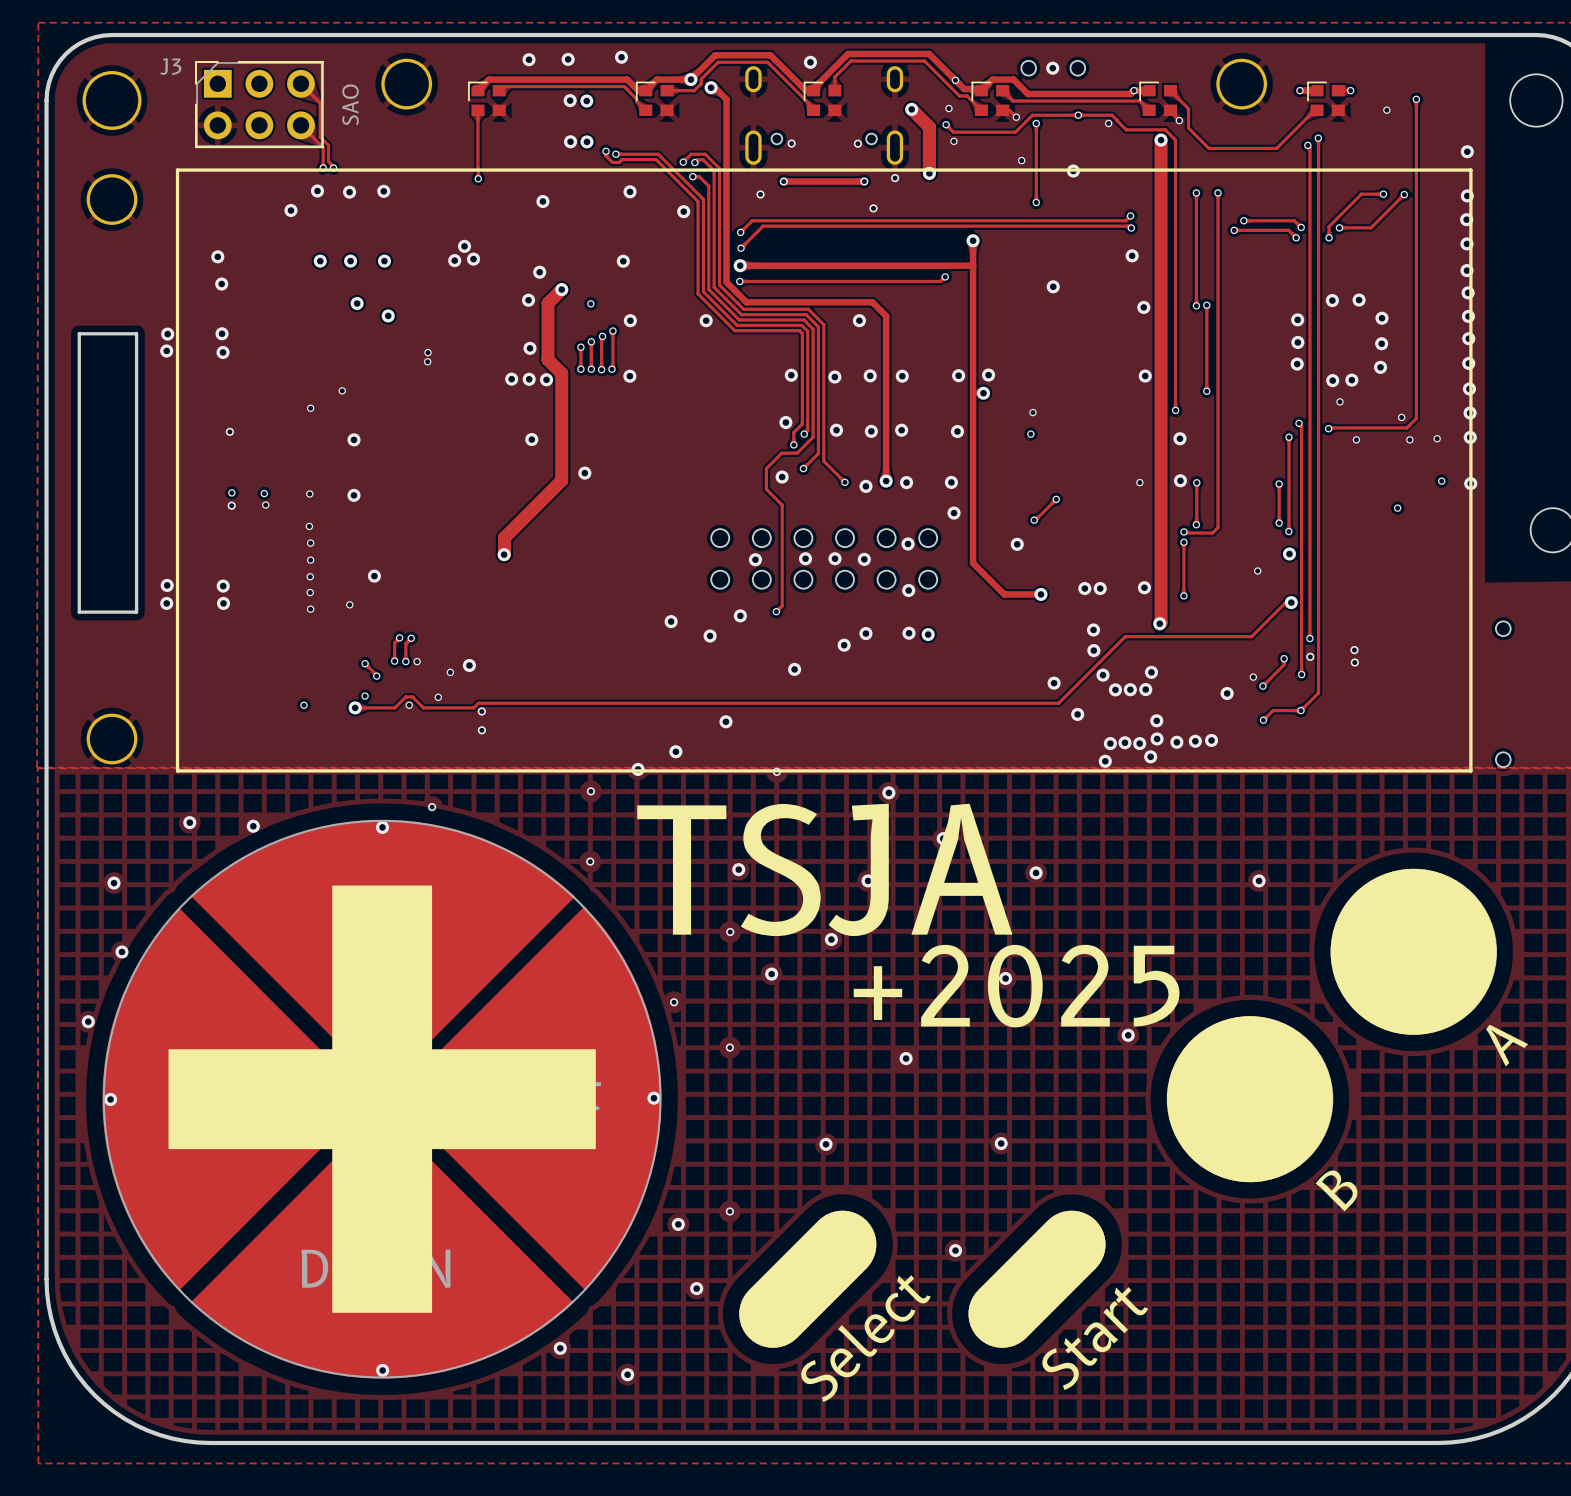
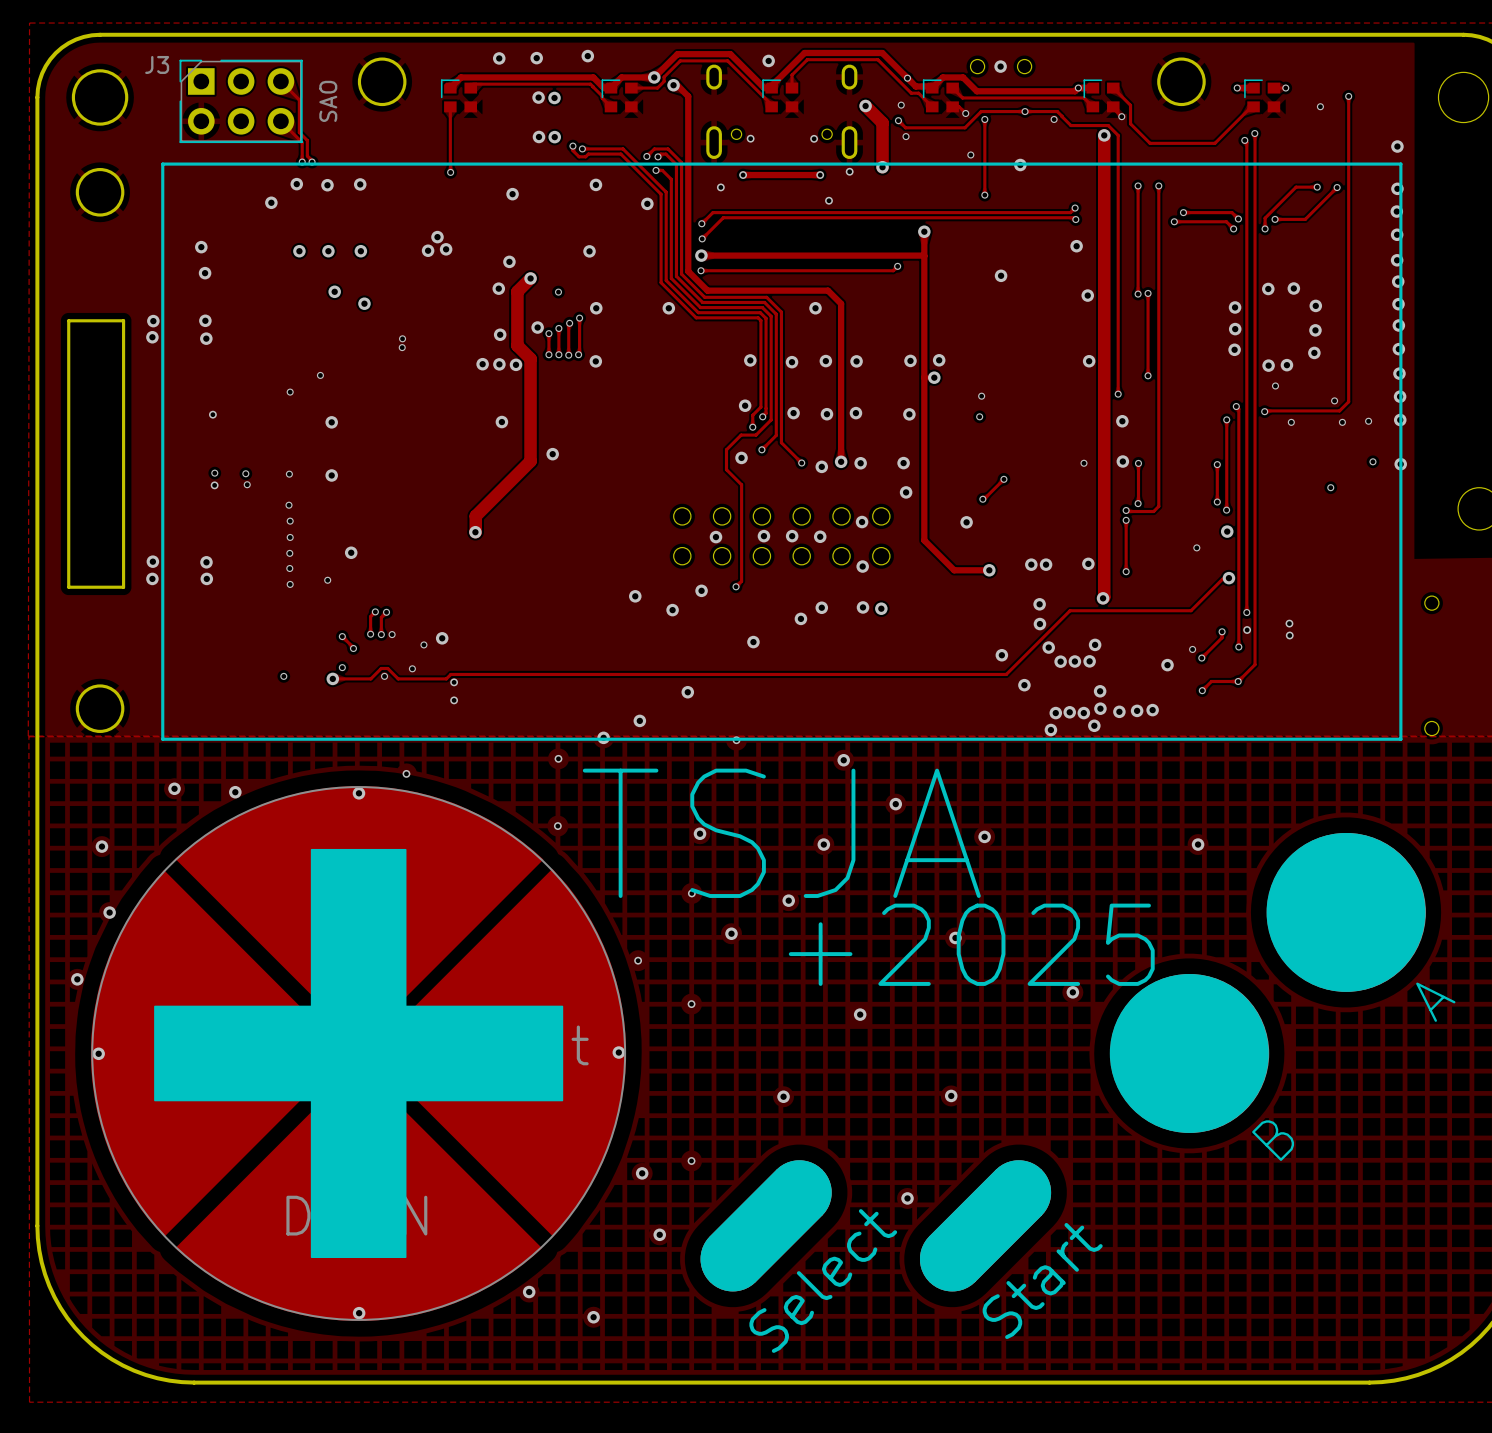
via: none -> (537, 327)

